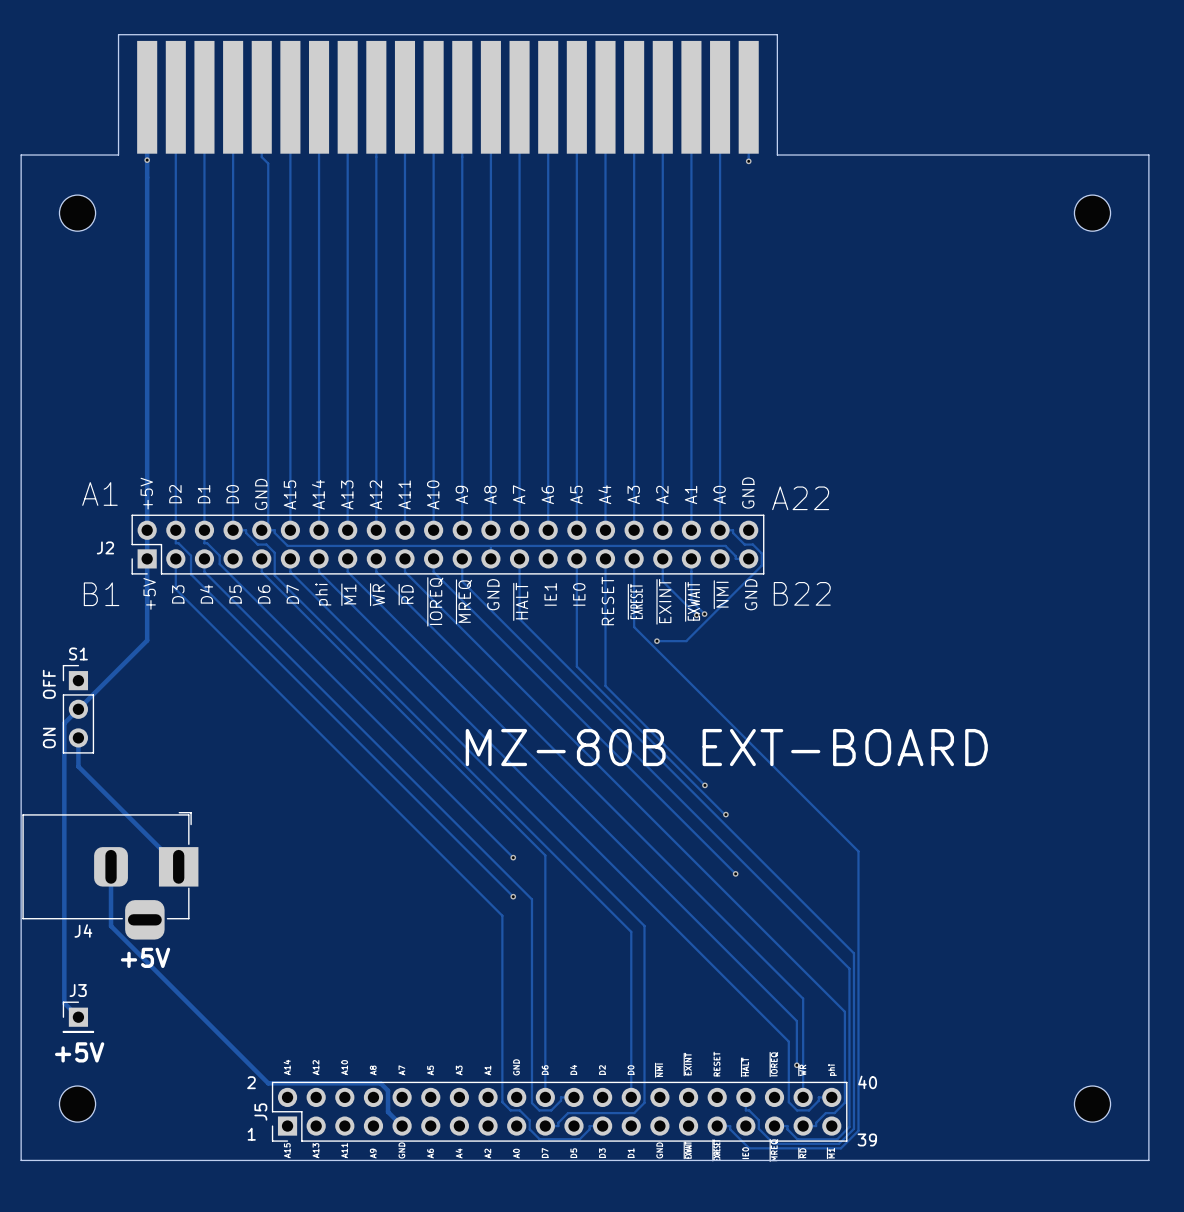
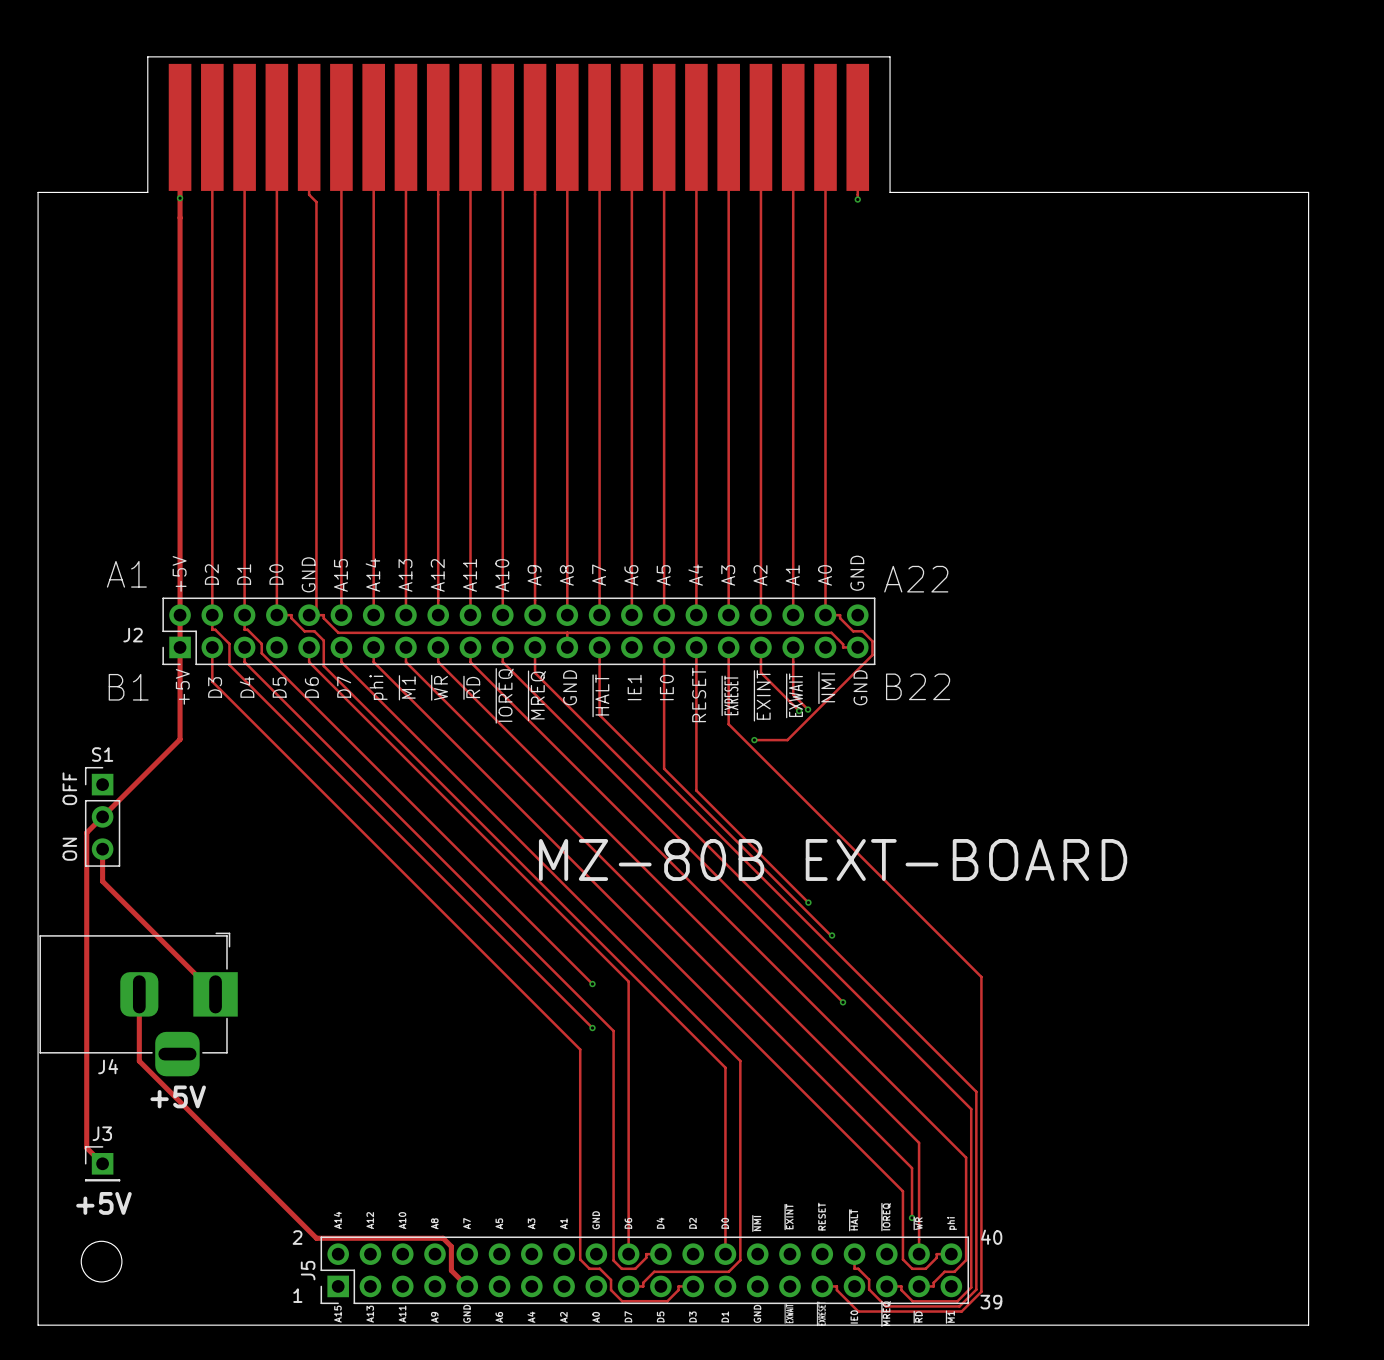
part: (77, 213) -> none
part: (1092, 213) -> none
part: (1092, 1104) -> none

